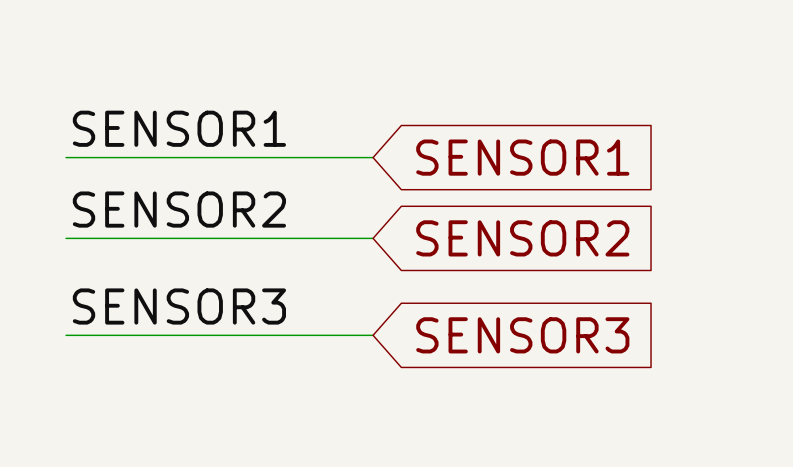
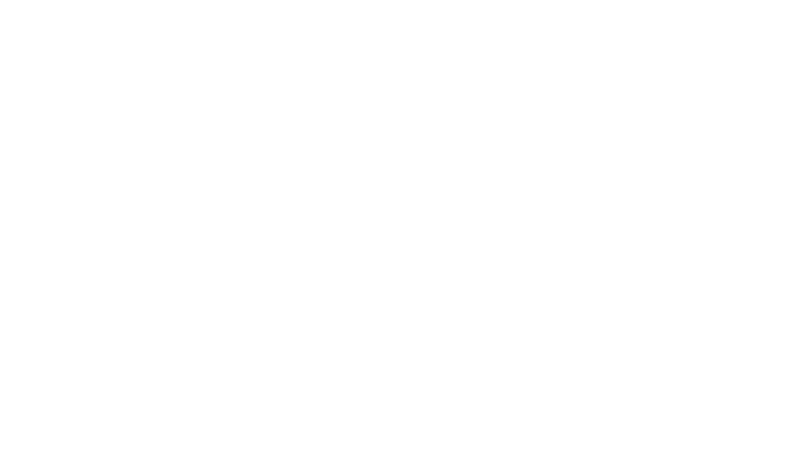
label: SENSOR1 (179, 128) -> none
wire: (66, 157) (373, 157) -> none
global label: SENSOR1 (522, 157) -> none
label: SENSOR2 (179, 209) -> none
wire: (66, 238) (373, 238) -> none
global label: SENSOR2 (522, 238) -> none
label: SENSOR3 (179, 306) -> none
wire: (66, 335) (373, 335) -> none
global label: SENSOR3 (522, 335) -> none

